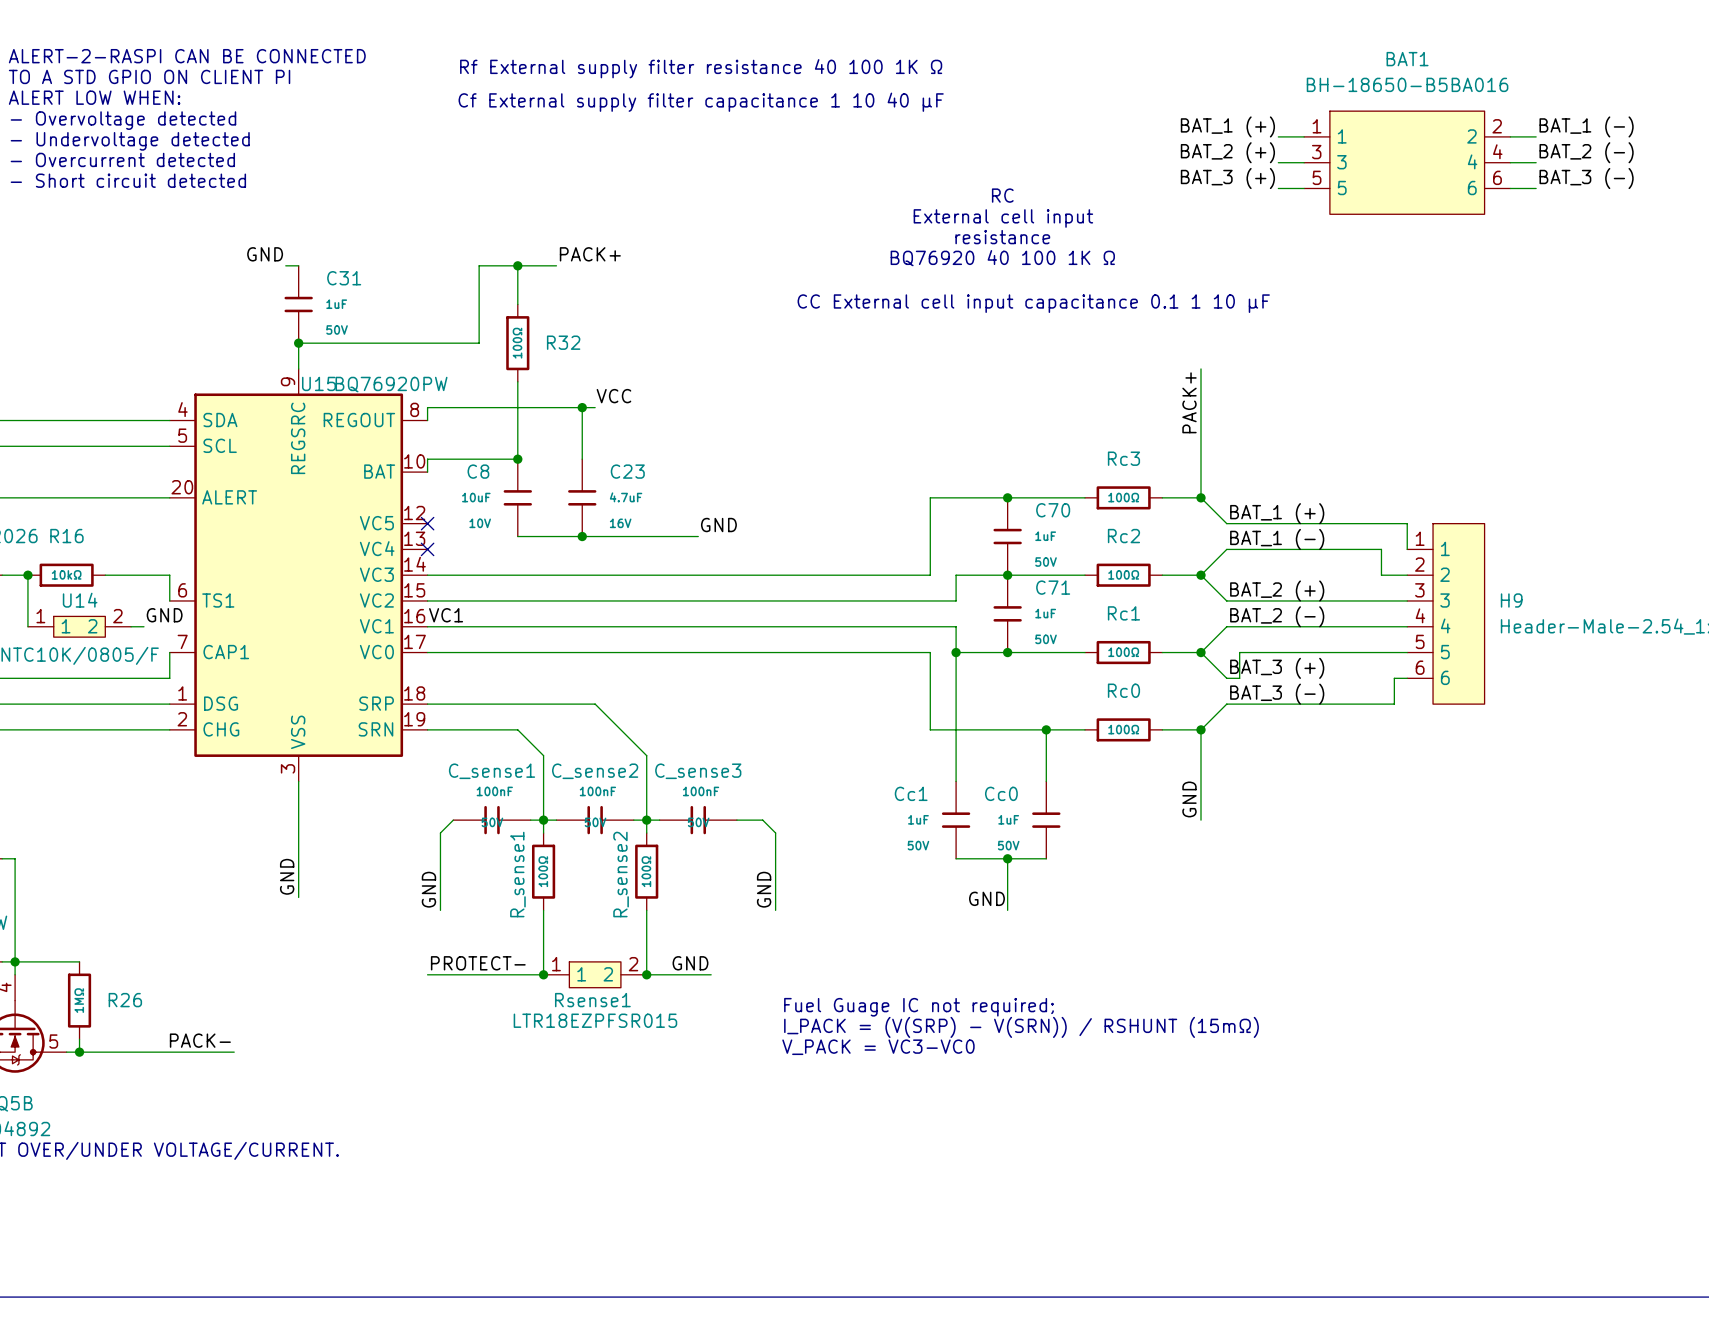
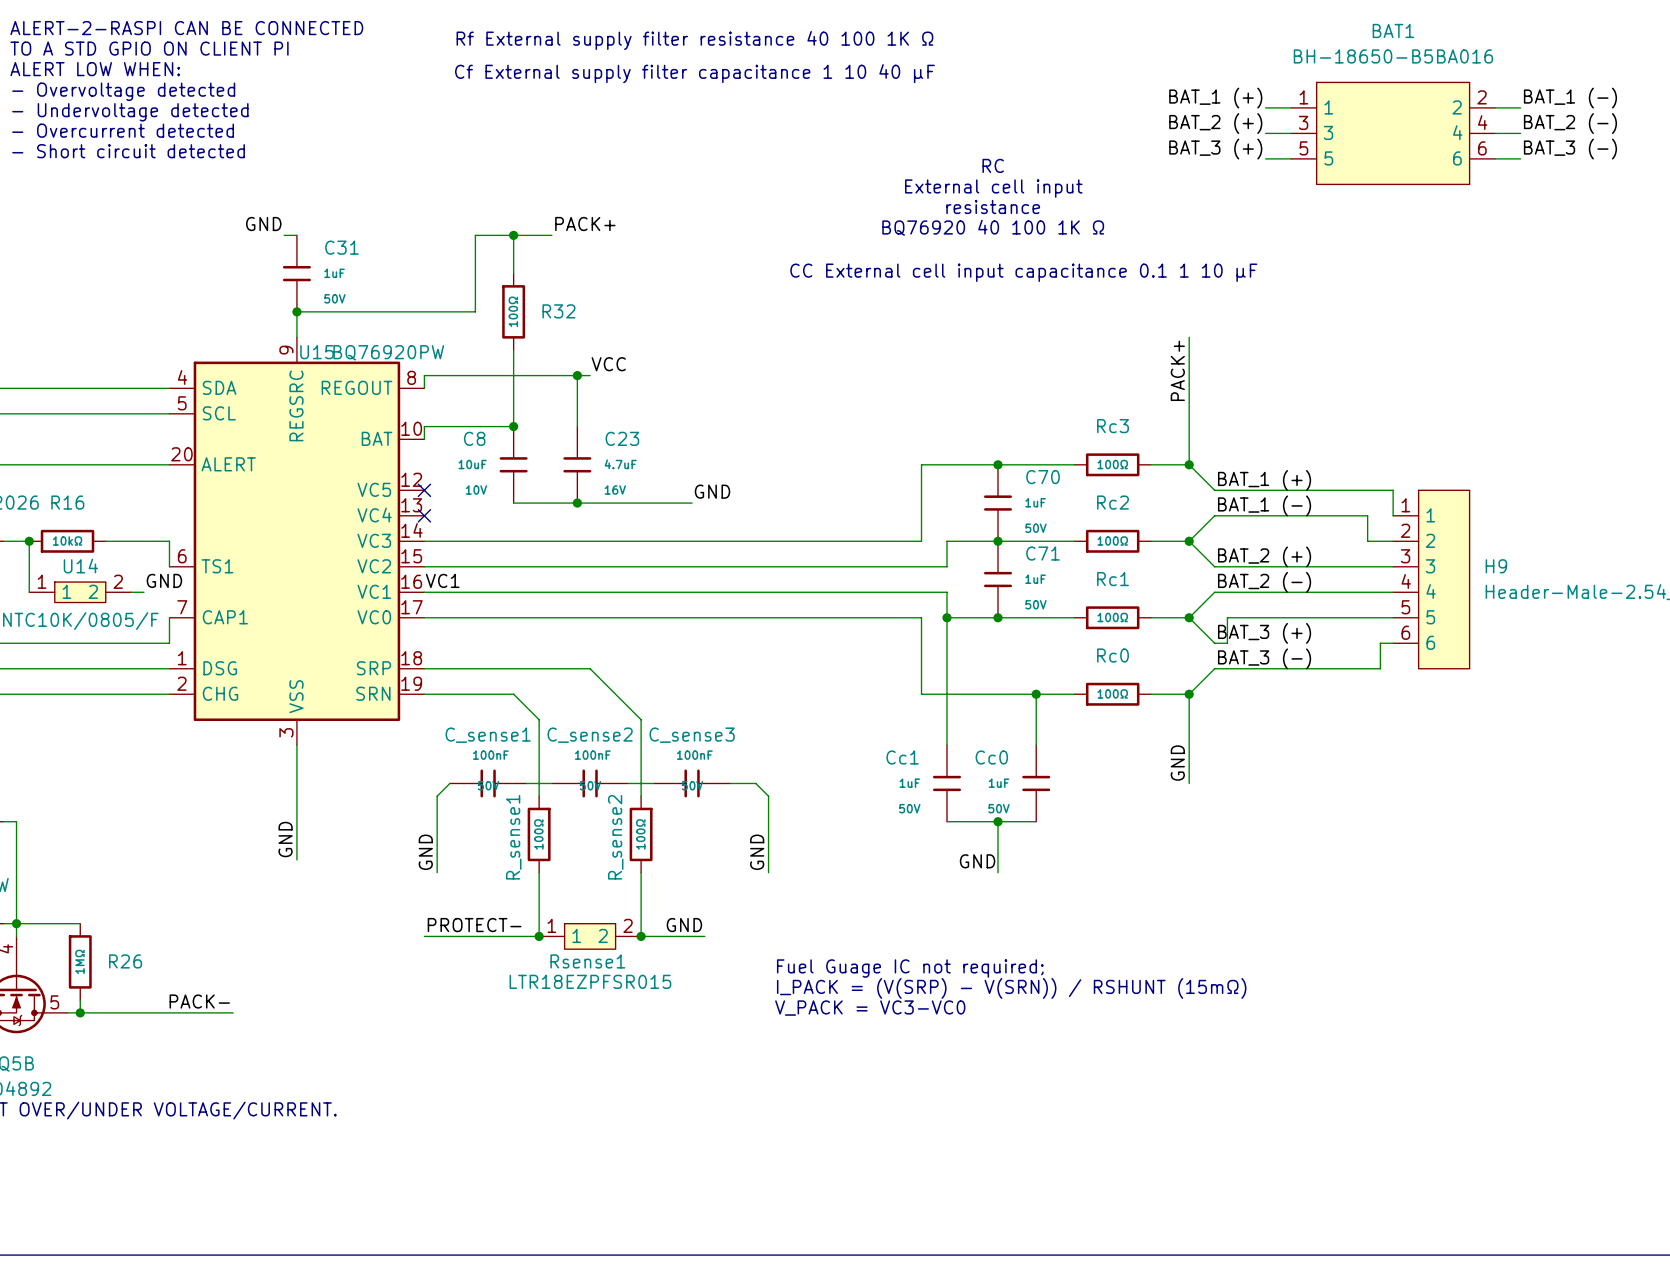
junction: (543, 820) -> none
junction: (646, 820) -> none

